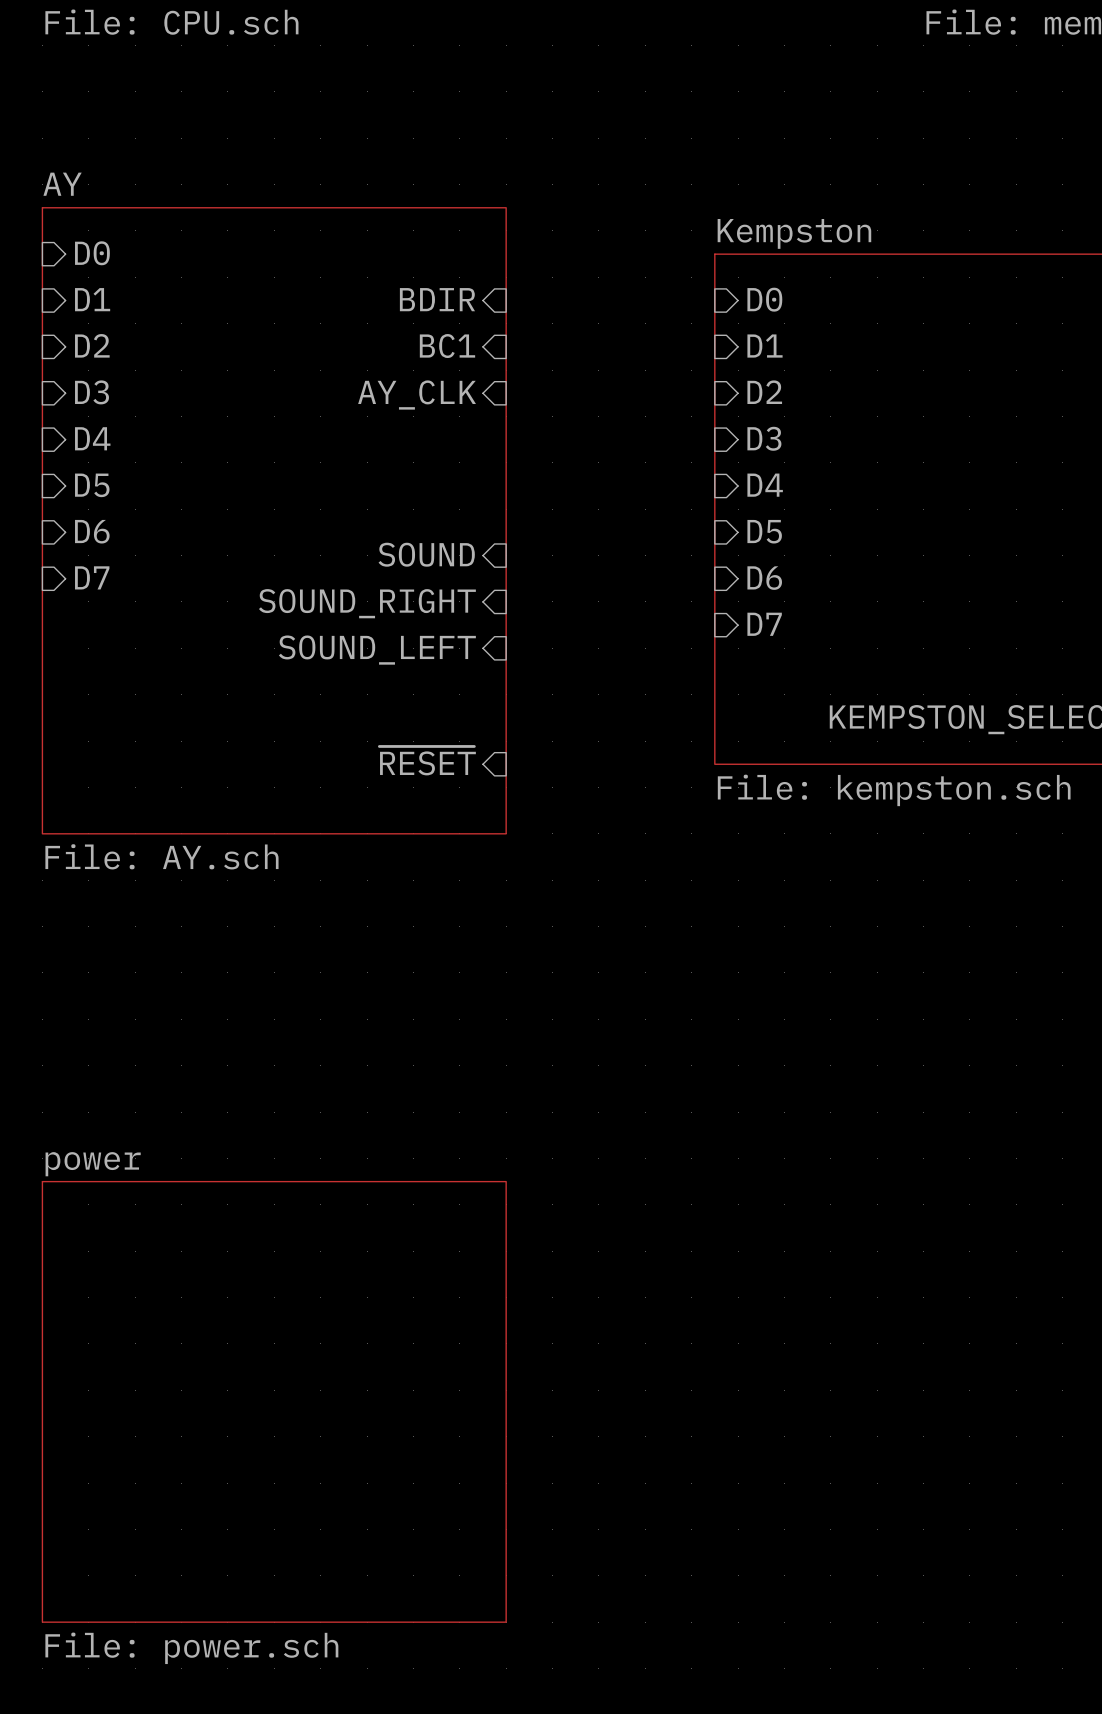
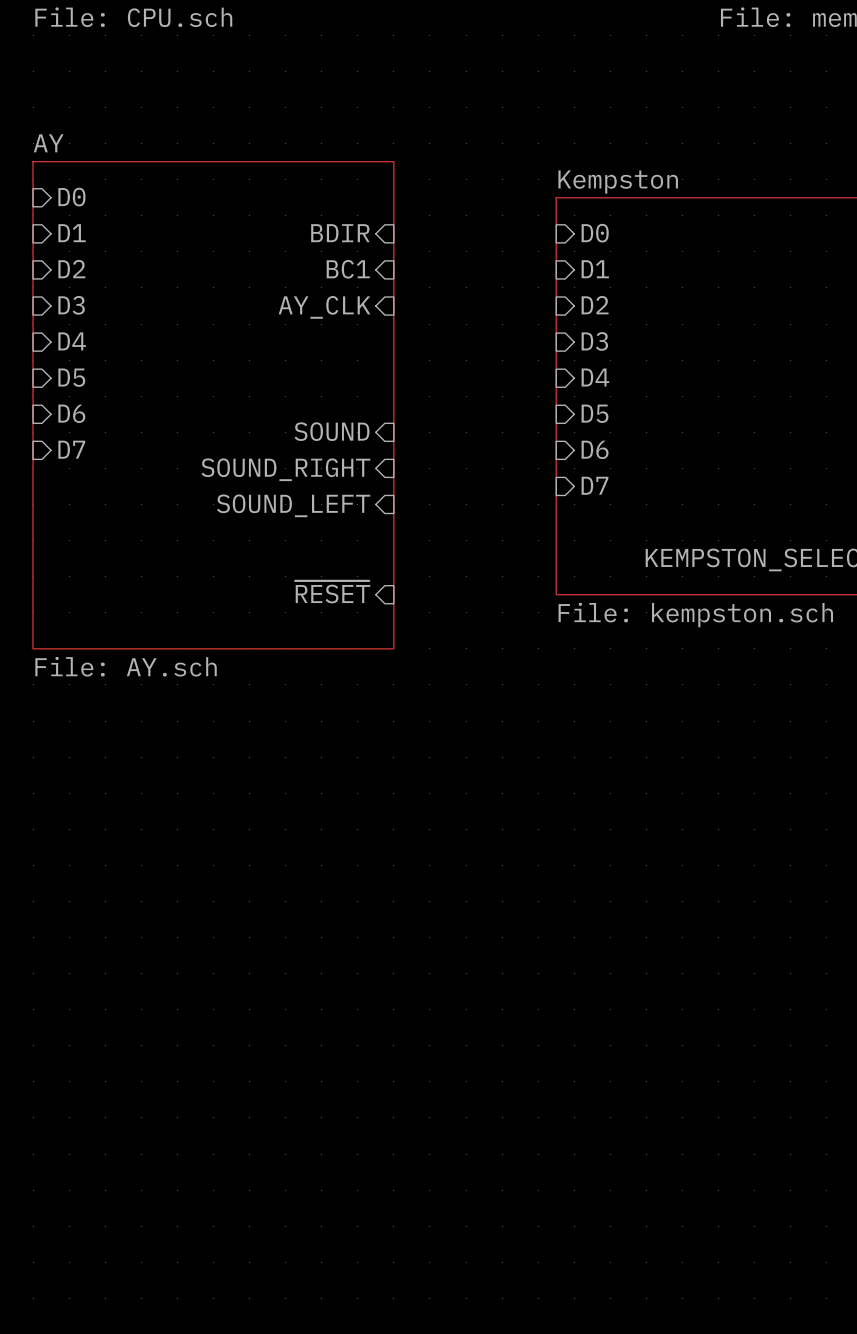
sheet power: File: power.sch (274, 1401) -> none

